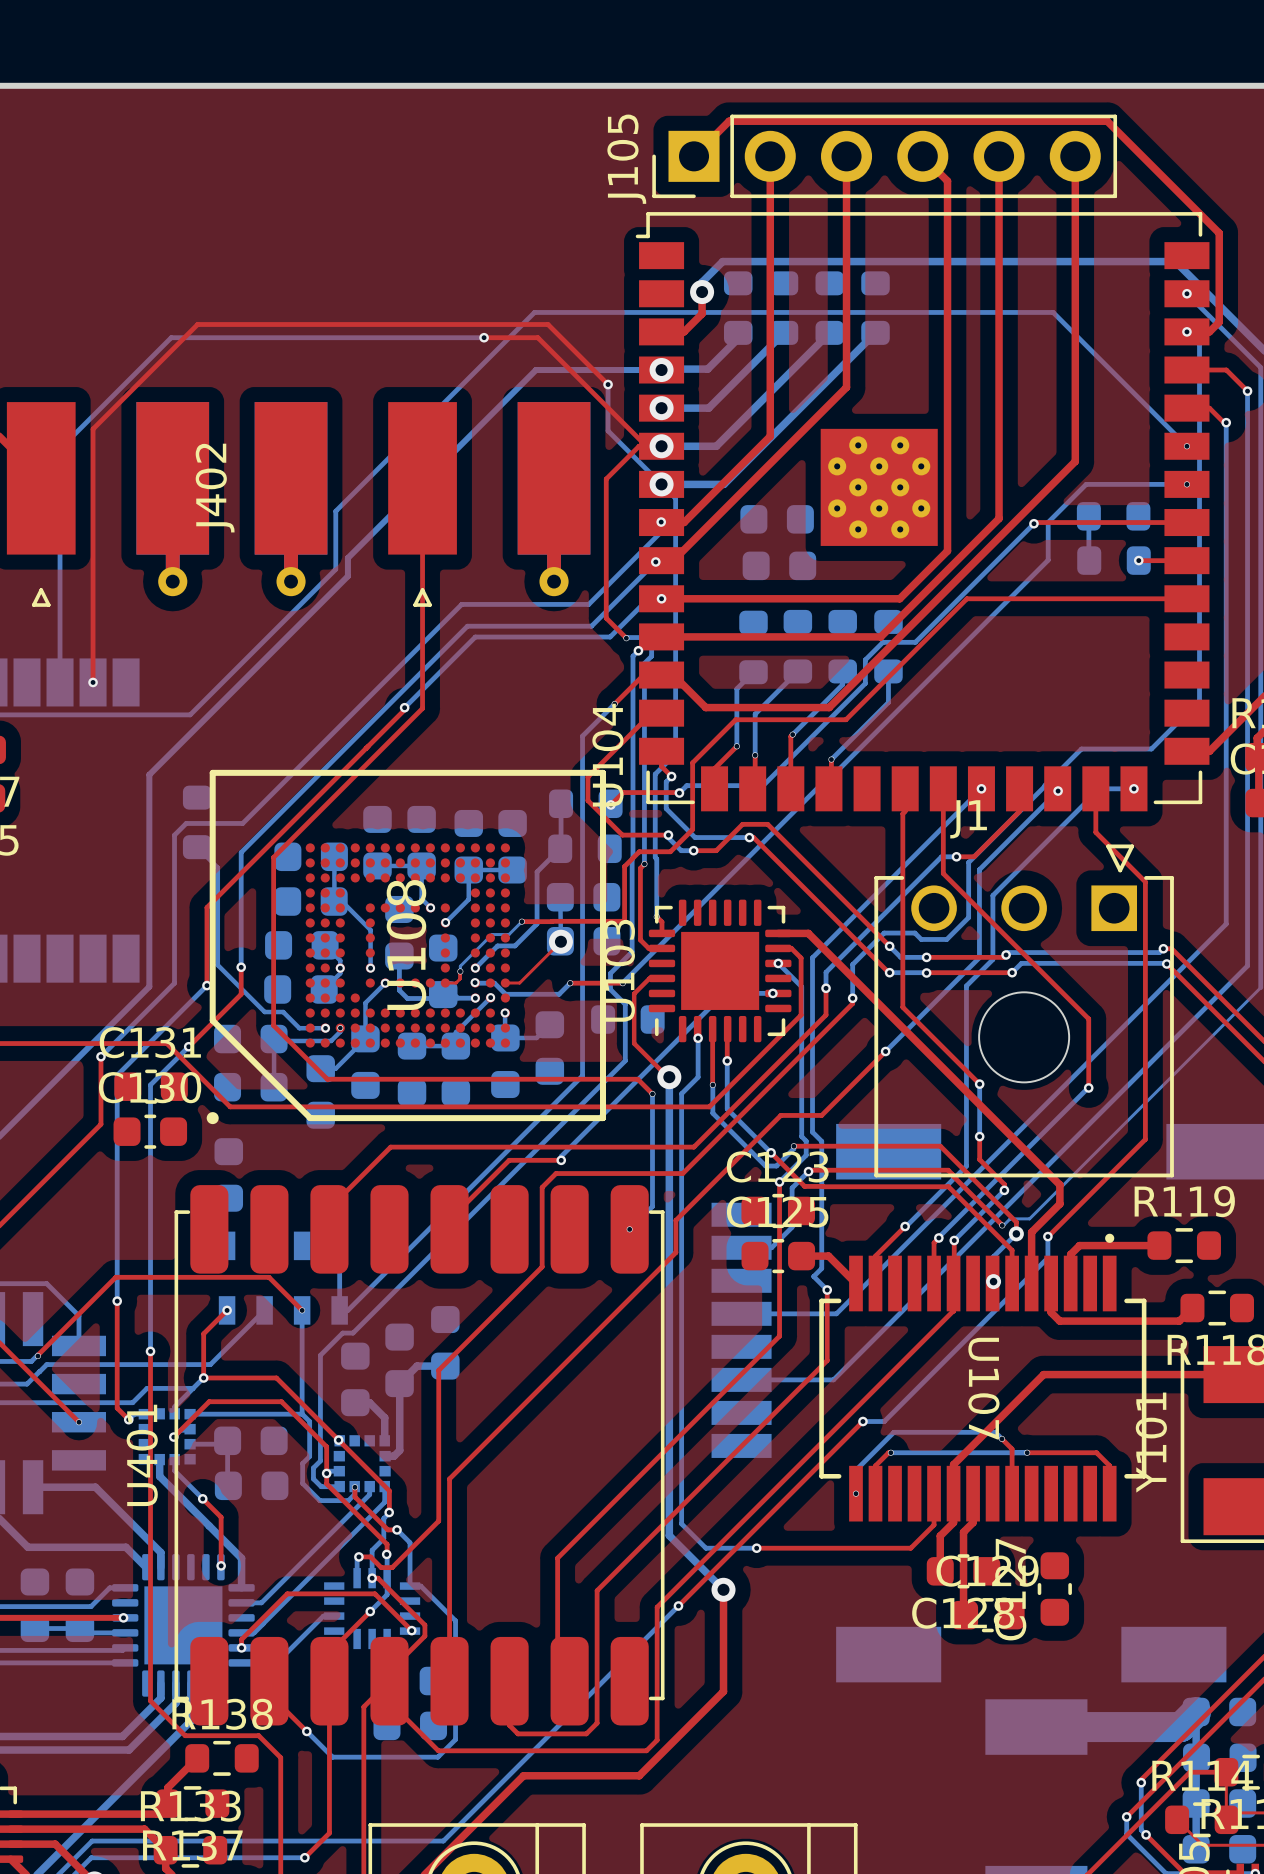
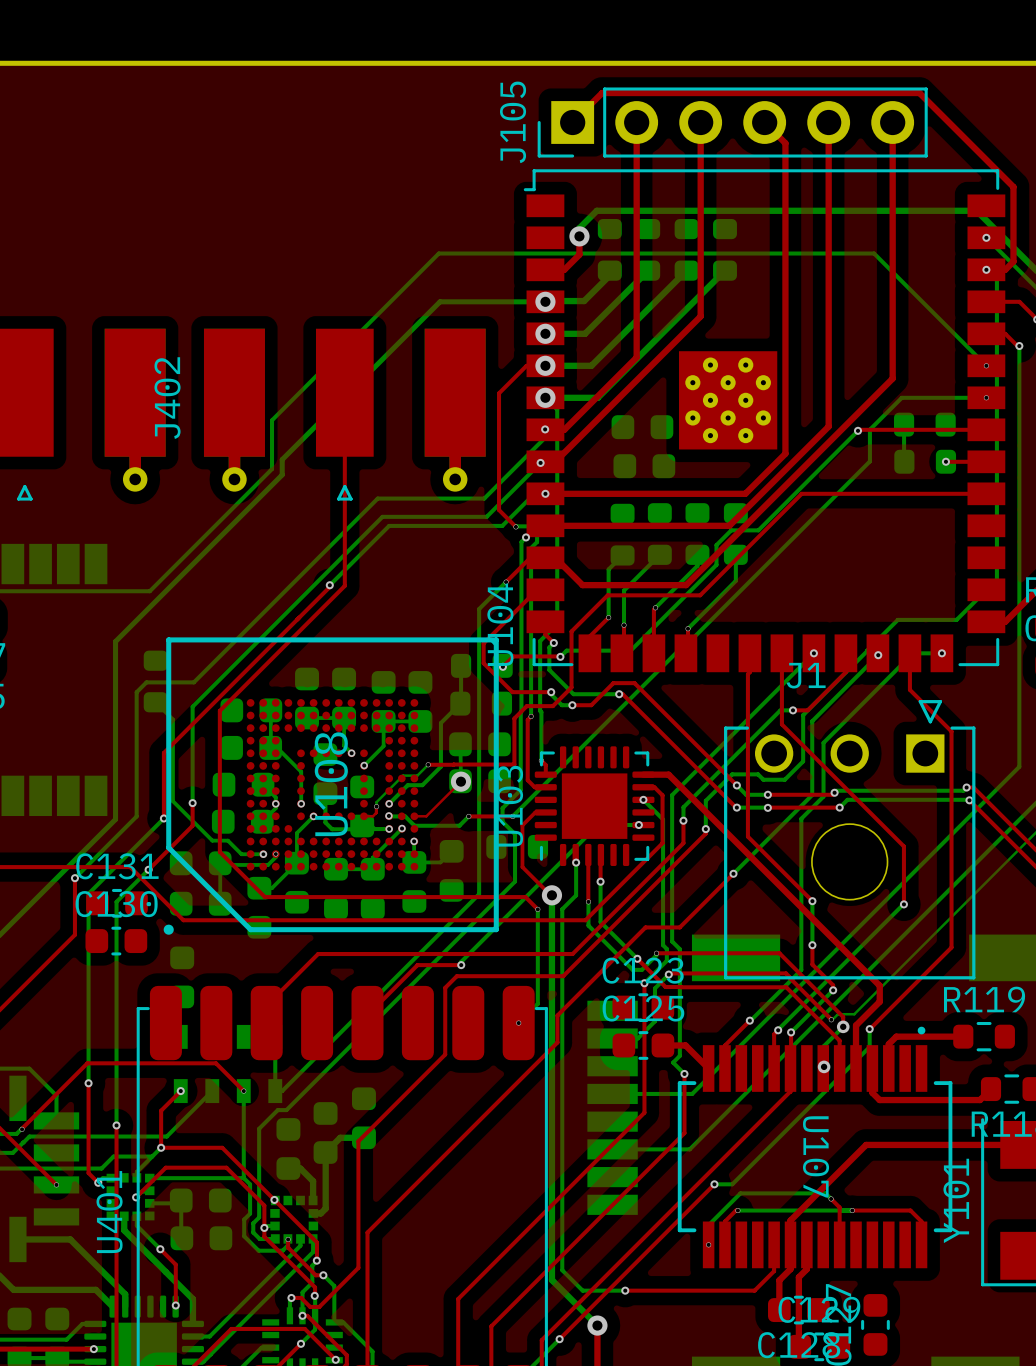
bottom track: (484, 337) (171, 337) (60, 448) (60, 682) -> none
top track: (484, 337) (537, 337) (646, 446) -> none
via: (484, 337) -> none
bottom track: (608, 384) (608, 430) (661, 484) -> none
top track: (608, 384) (548, 324) (197, 324) (93, 429) (93, 682) -> none
via: (608, 384) -> none
via: (93, 682) -> none

